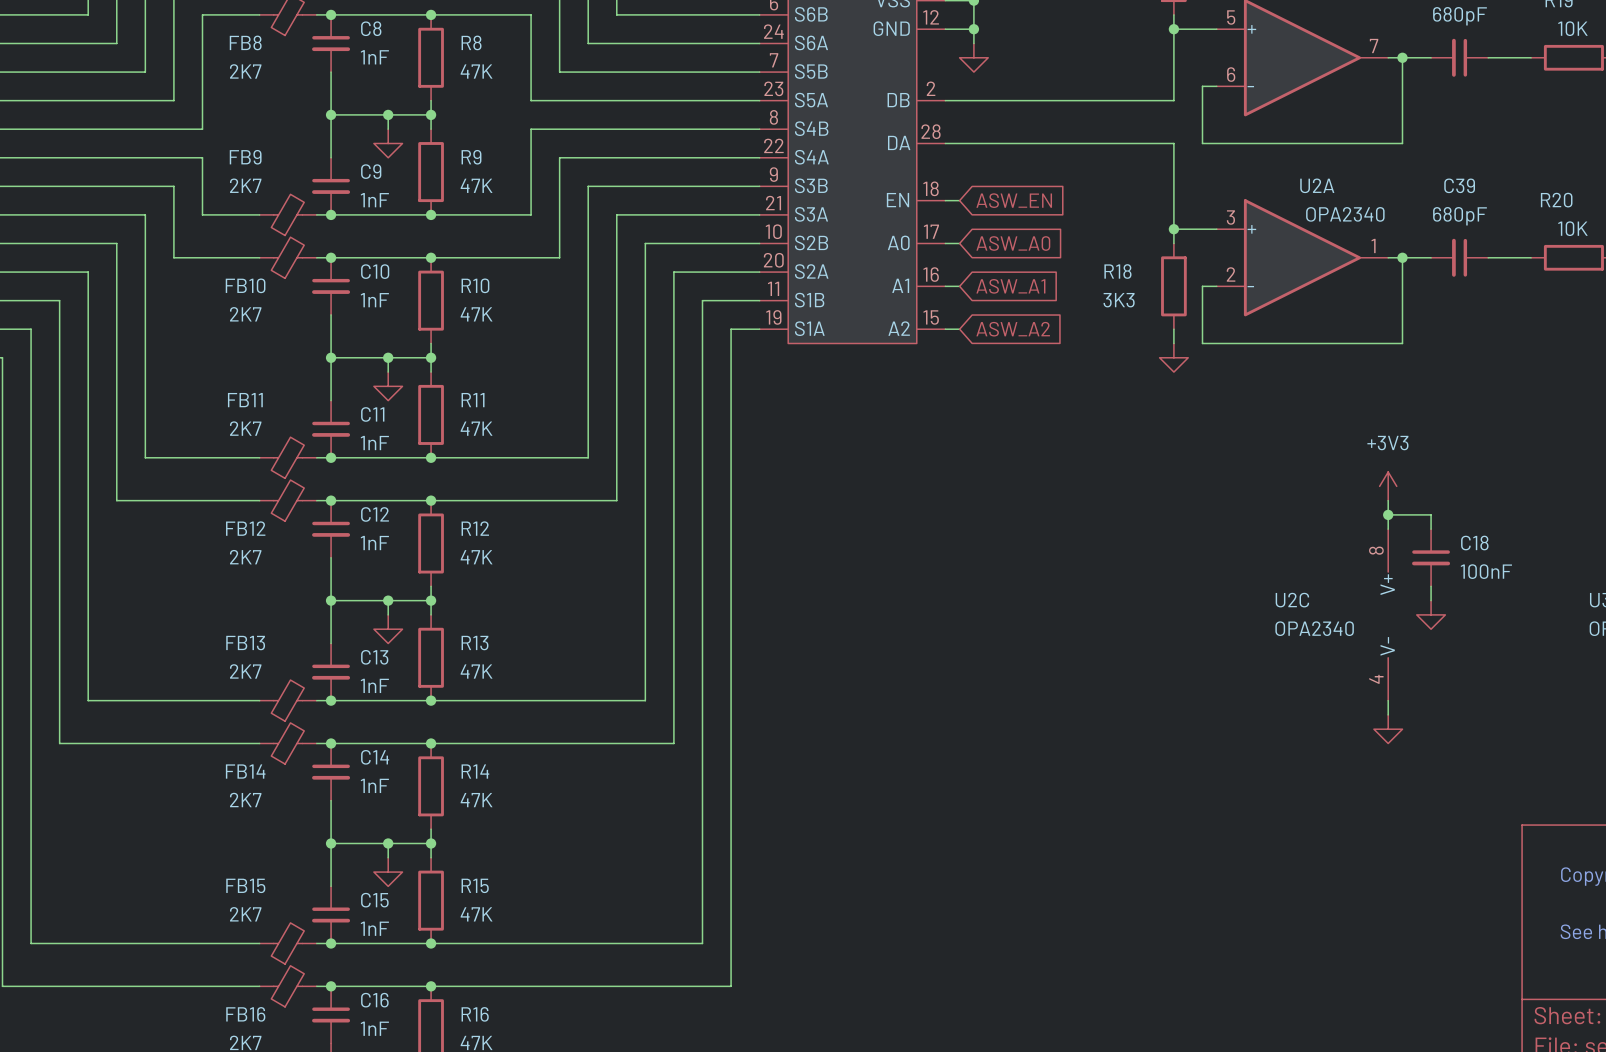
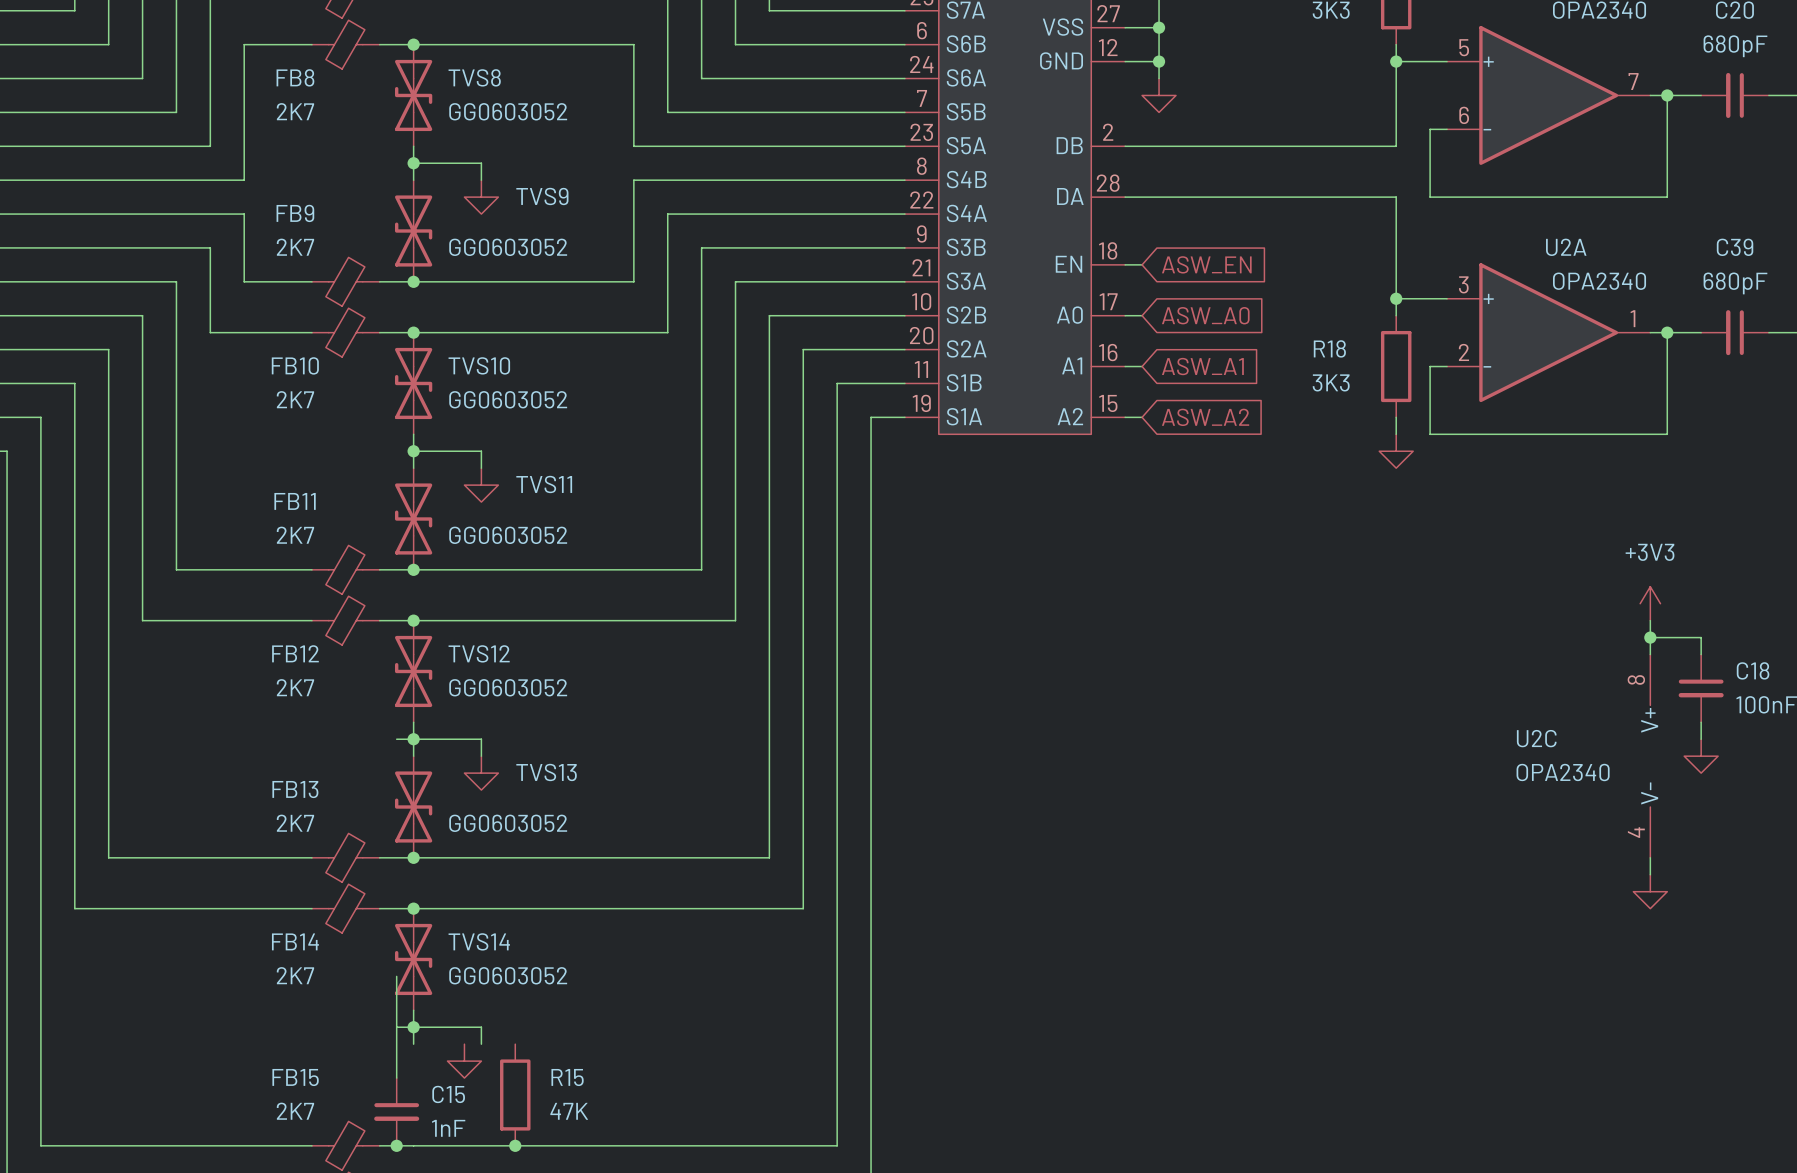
junction position: (331, 14) -> (413, 44)
junction: (431, 14) -> none
C8: 1nF (331, 43) -> none
TVS8: none -> GG0603052 (413, 95)
R8: 47K (431, 57) -> none
wire: (331, 72) (331, 157) -> none
wire: (431, 100) (431, 129) -> (413, 146) (413, 180)
wire: (331, 114) (345, 114) -> none
junction position: (331, 114) -> (413, 163)
wire: (388, 114) (388, 129) -> none
junction: (388, 114) -> none
wire: (402, 114) (431, 114) -> (481, 163) (481, 180)
junction: (431, 114) -> none
power symbol position: (388, 143) -> (481, 197)
TVS9: none -> GG0603052 (413, 231)
R9: 47K (431, 172) -> none
C9: 1nF (331, 186) -> none
junction position: (331, 214) -> (413, 281)
junction: (431, 214) -> none
junction position: (331, 257) -> (413, 332)
junction: (431, 257) -> none
C10: 1nF (331, 286) -> none
TVS10: none -> GG0603052 (413, 383)
R10: 47K (431, 300) -> none
wire: (331, 314) (331, 400) -> none
wire: (431, 343) (431, 372) -> (413, 434) (413, 468)
wire: (331, 357) (345, 357) -> none
junction position: (331, 357) -> (413, 451)
wire: (388, 357) (388, 372) -> none
junction: (388, 357) -> none
wire: (402, 357) (431, 357) -> (481, 451) (481, 468)
junction: (431, 357) -> none
power symbol position: (388, 386) -> (481, 485)
TVS11: none -> GG0603052 (413, 519)
R11: 47K (431, 414) -> none
C11: 1nF (331, 429) -> none
junction position: (331, 457) -> (413, 569)
junction: (431, 457) -> none
junction position: (331, 500) -> (413, 620)
junction: (431, 500) -> none
C12: 1nF (331, 529) -> none
TVS12: none -> GG0603052 (413, 671)
R12: 47K (431, 543) -> none
wire: (331, 557) (331, 643) -> none
wire: (431, 586) (431, 614) -> (413, 722) (413, 756)
junction position: (331, 600) -> (413, 739)
wire: (388, 600) (388, 614) -> none
junction: (388, 600) -> none
wire: (402, 600) (431, 600) -> (481, 739) (481, 756)
junction: (431, 600) -> none
power symbol position: (388, 629) -> (481, 773)
TVS13: none -> GG0603052 (413, 807)
R13: 47K (431, 657) -> none
C13: 1nF (331, 672) -> none
junction position: (331, 700) -> (413, 857)
junction: (431, 700) -> none
junction position: (331, 743) -> (413, 908)
junction: (431, 743) -> none
C14: 1nF (331, 772) -> none
TVS14: none -> GG0603052 (413, 959)
R14: 47K (431, 786) -> none
wire: (431, 829) (431, 857) -> (413, 1010) (413, 1044)
junction position: (331, 843) -> (413, 1027)
wire: (388, 843) (388, 857) -> none
junction: (388, 843) -> none
wire: (402, 843) (431, 843) -> (481, 1027) (481, 1044)
junction: (431, 843) -> none

